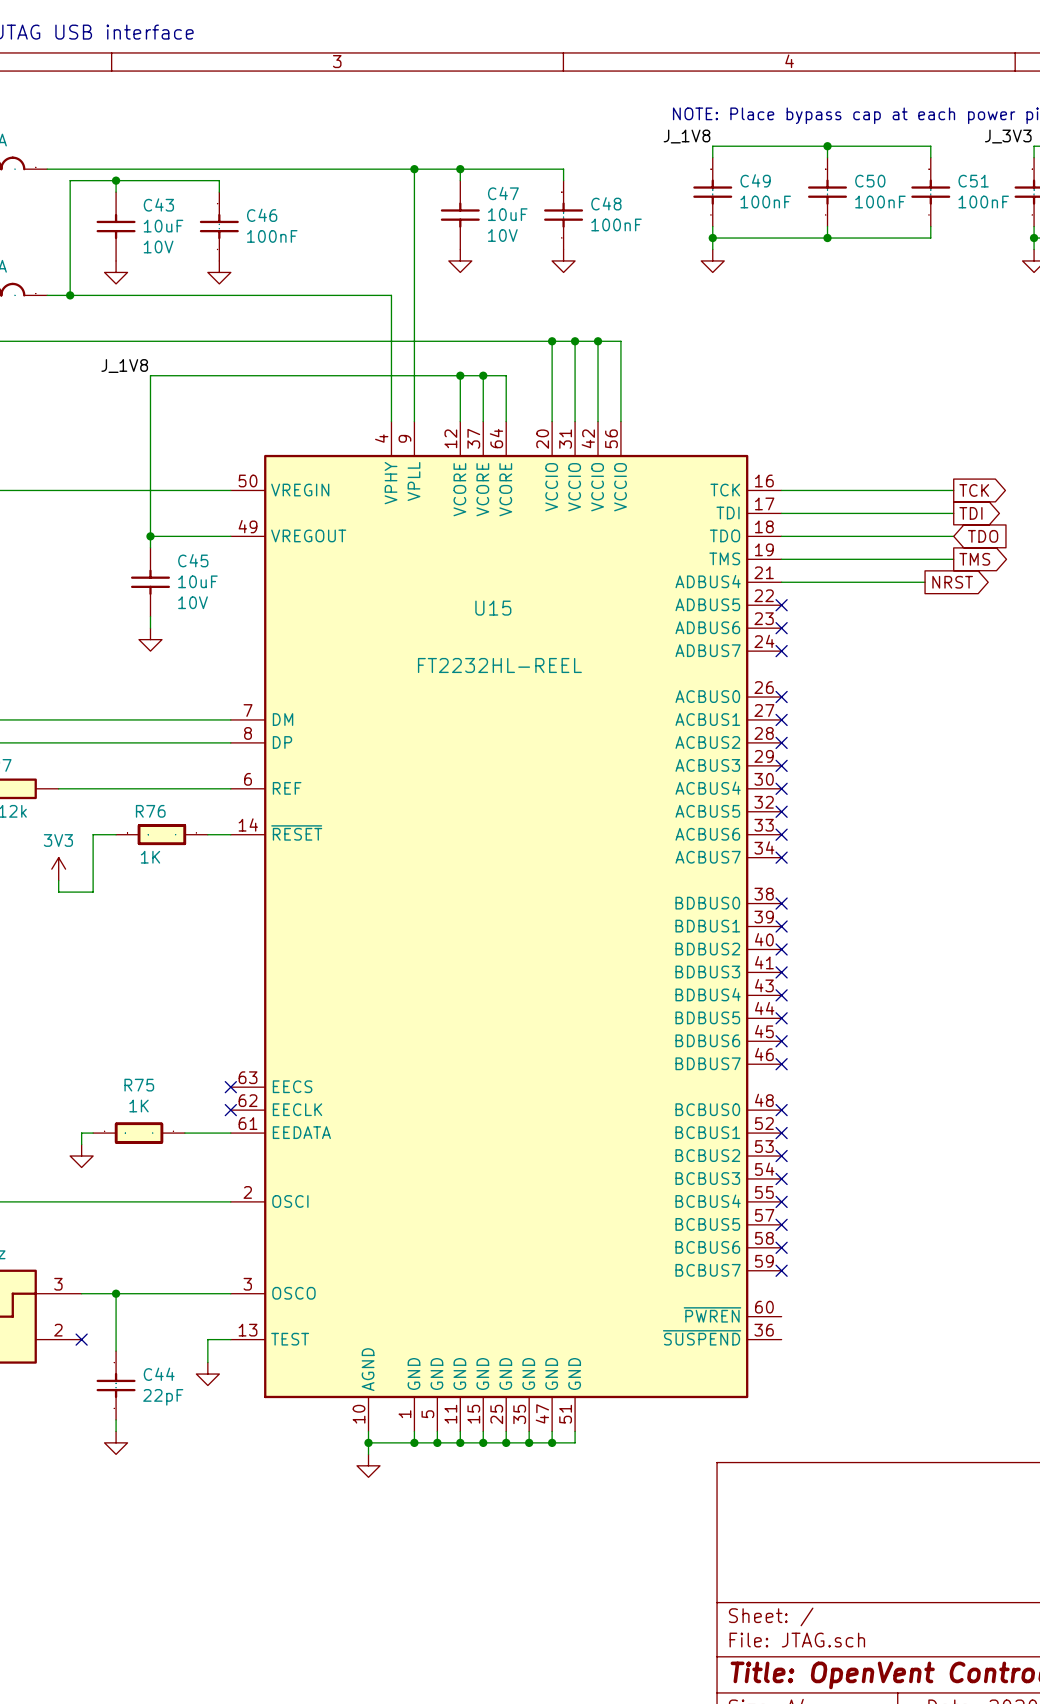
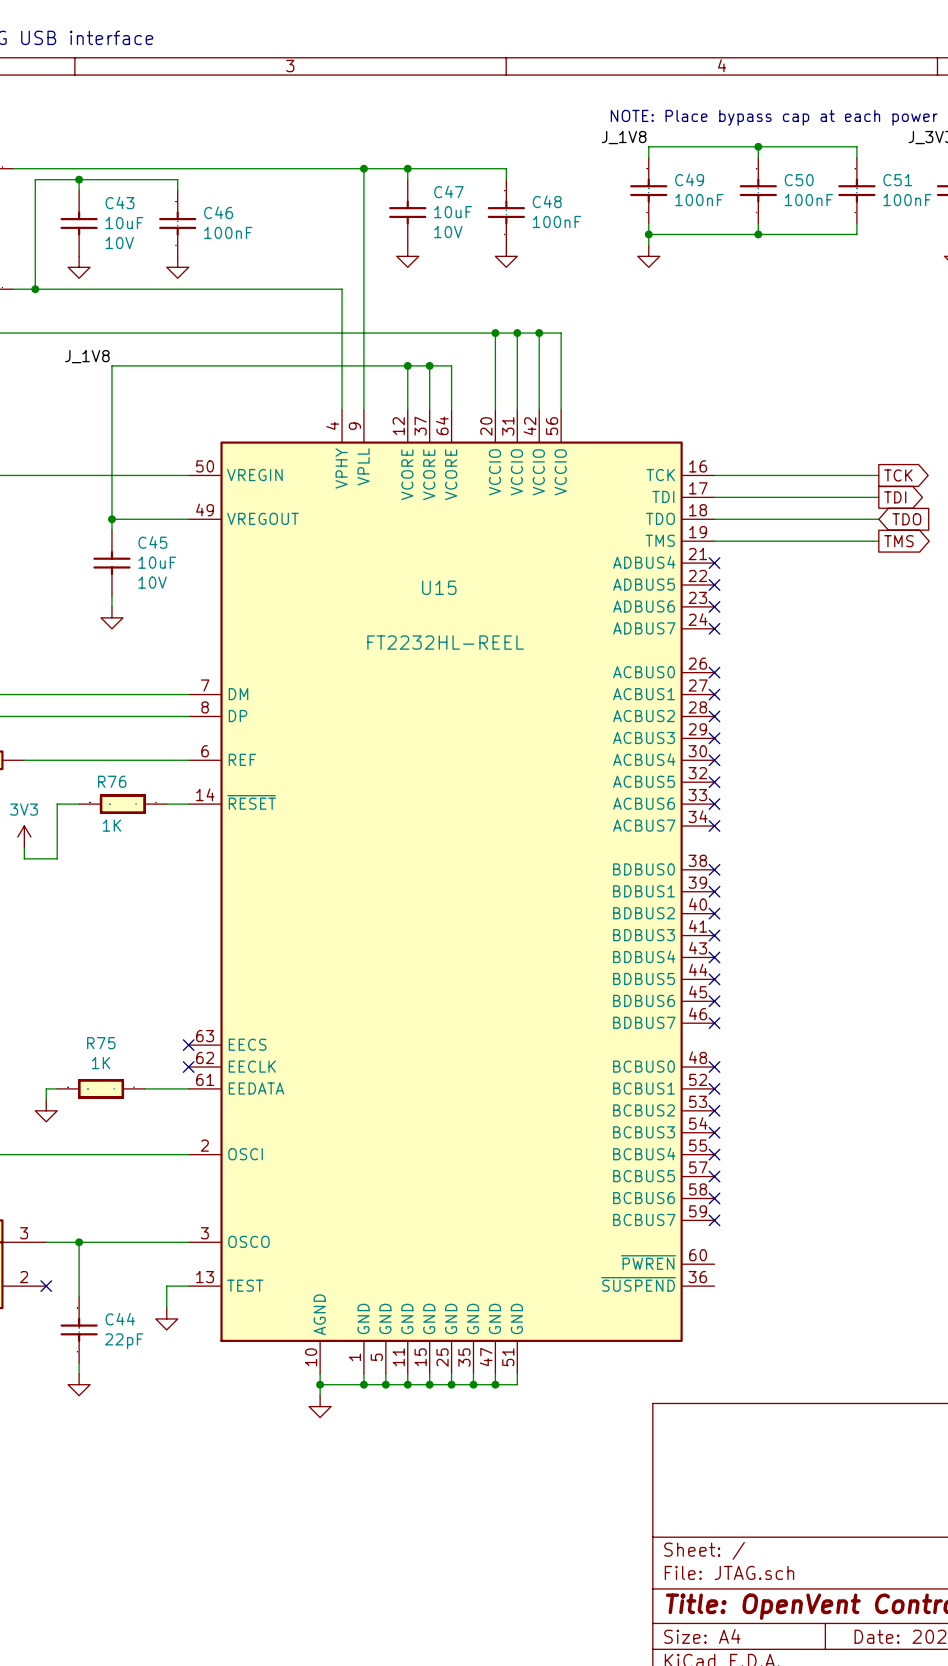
wire: (781, 582) (925, 582) -> none
no-connect mark: none -> (714, 563)
global label: NRST (952, 582) -> none

